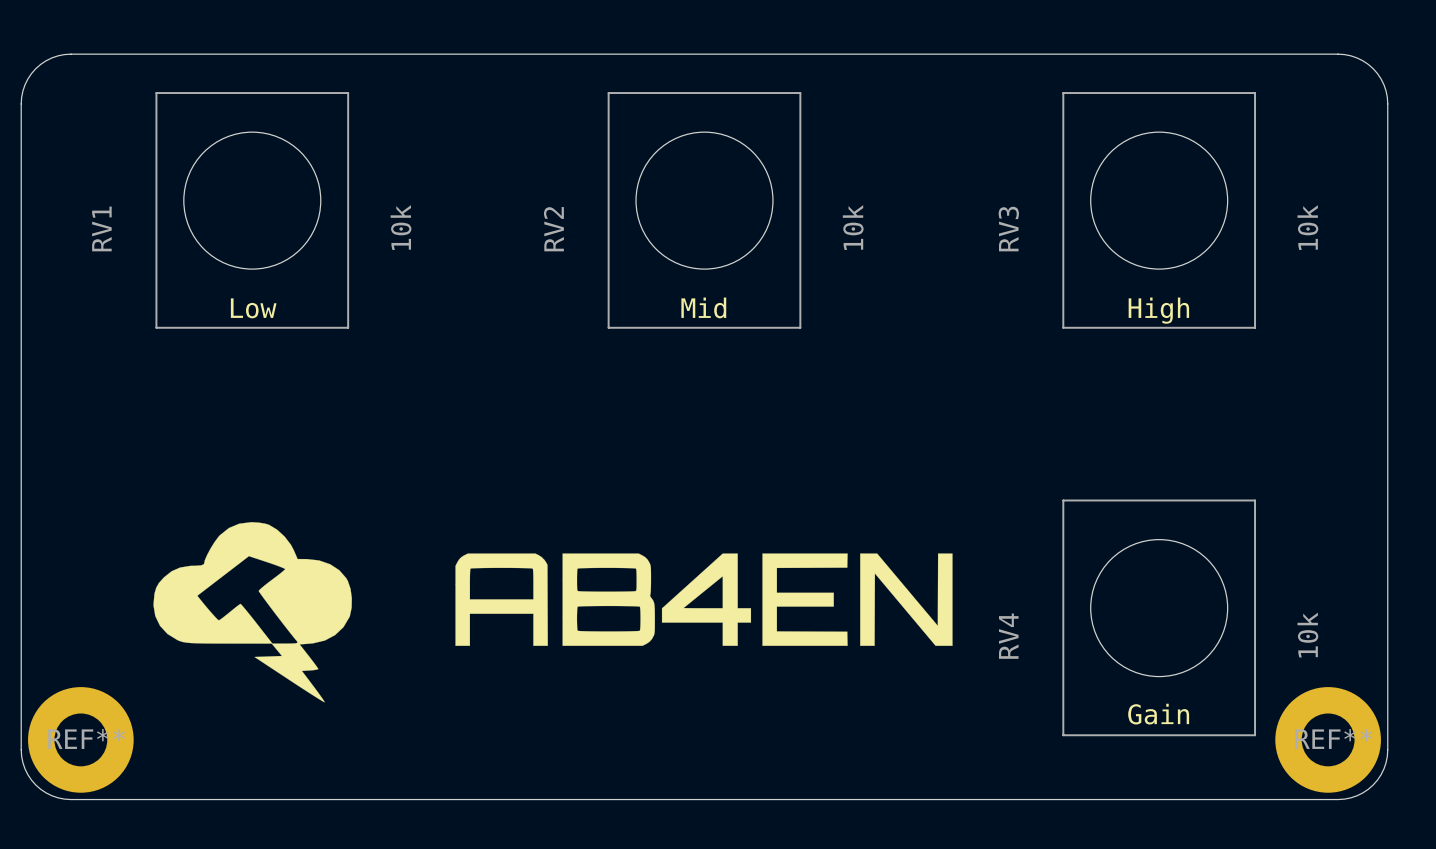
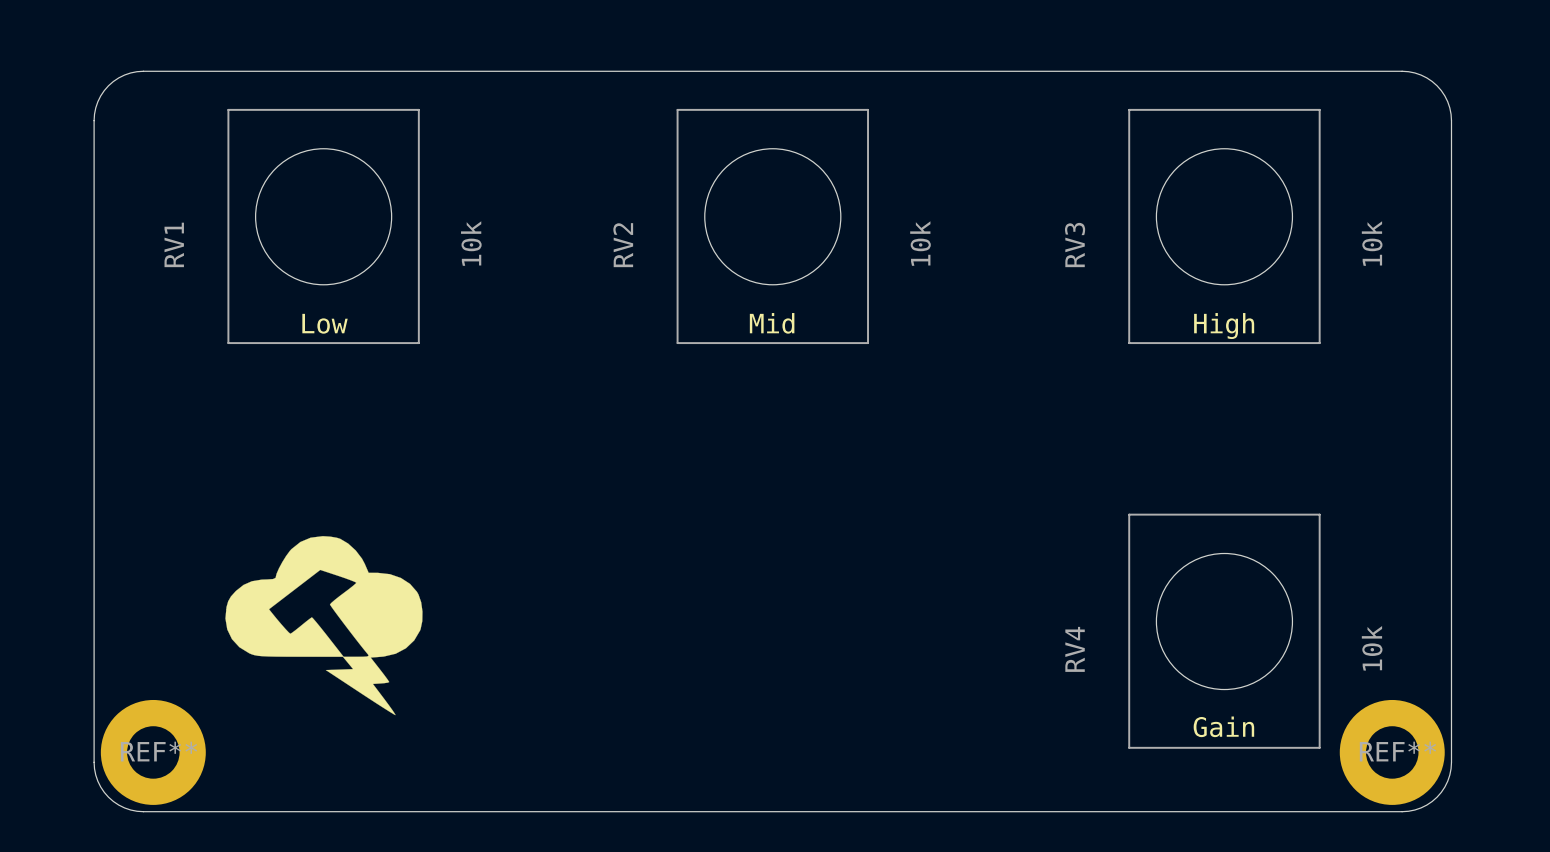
drawing: [455, 553, 953, 646] -> none

